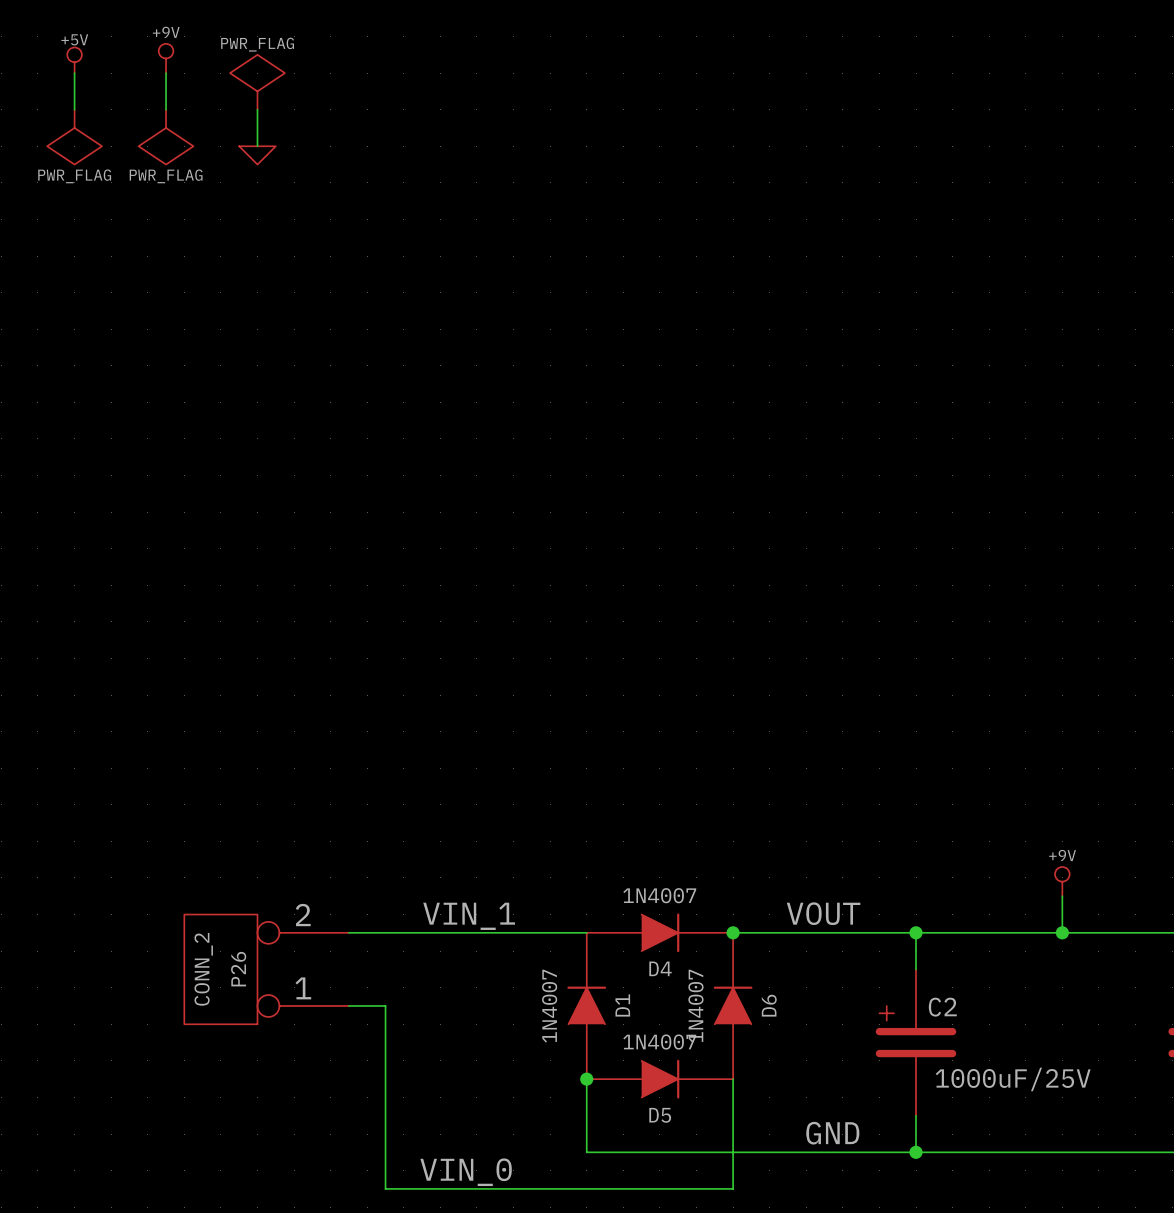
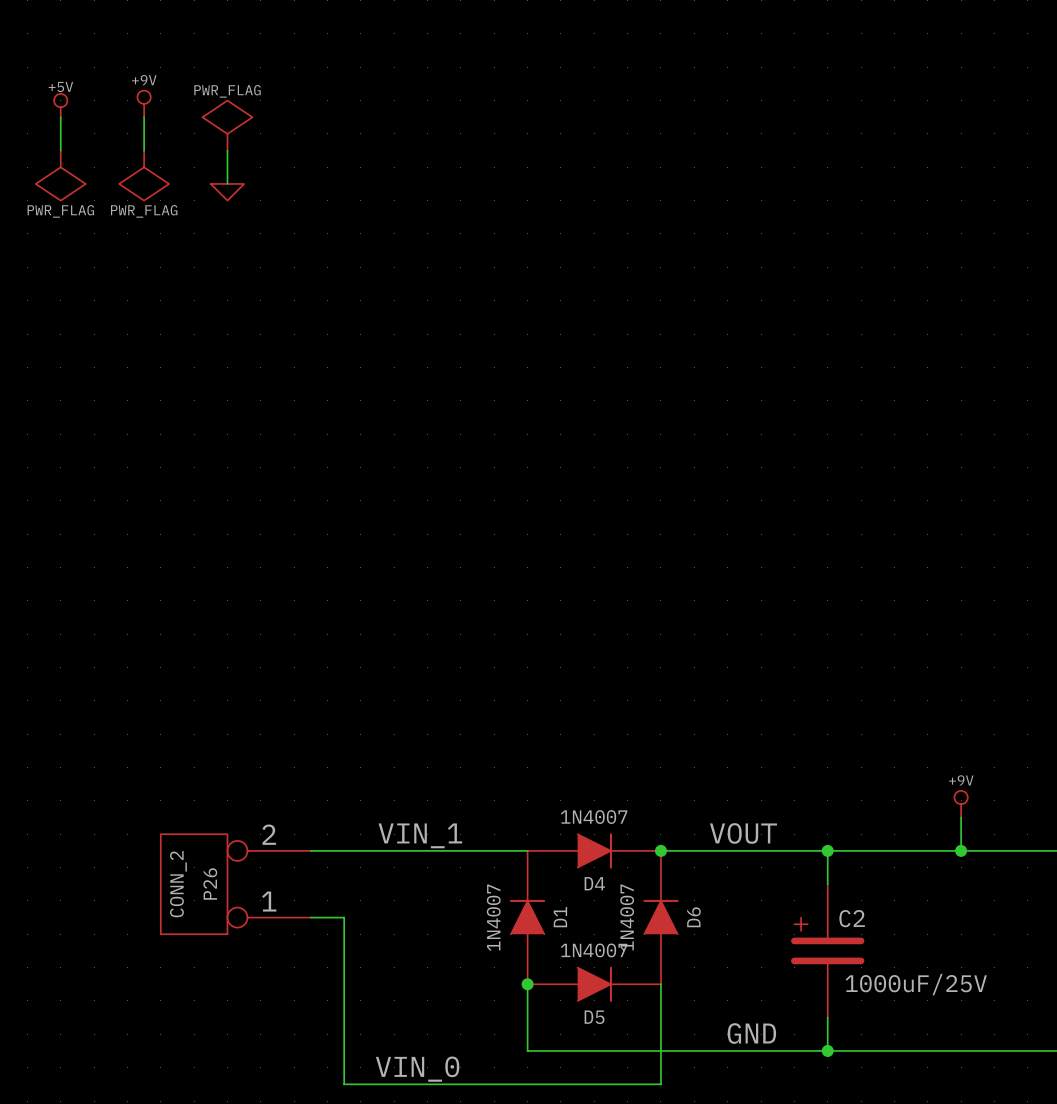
power symbol position: +9V (166, 58) -> +9V (144, 103)
power symbol position: +5V (74, 60) -> +5V (60, 105)
wire: (74, 73) (74, 109) -> (60, 117) (60, 150)
wire: (166, 73) (166, 109) -> (144, 117) (144, 150)
power symbol: PWR_FLAG (257, 82) -> none
wire: (257, 109) (257, 146) -> (227, 150) (227, 183)
power symbol: PWR_FLAG (74, 137) -> none
power symbol: PWR_FLAG (166, 137) -> none
power symbol: none -> PWR_FLAG (227, 125)
power symbol position: (257, 155) -> (227, 192)
power symbol: none -> PWR_FLAG (60, 175)
power symbol: none -> PWR_FLAG (144, 175)

